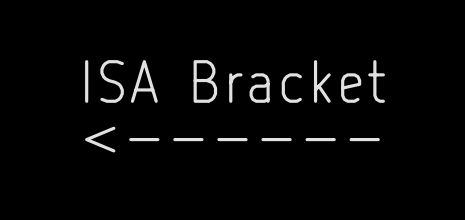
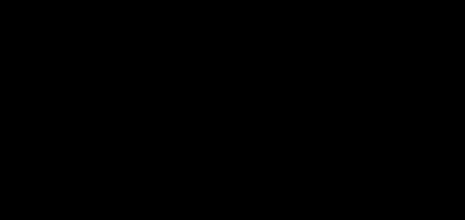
text: ISA Bracket (235, 81) -> none
text: <------ (232, 139) -> none

